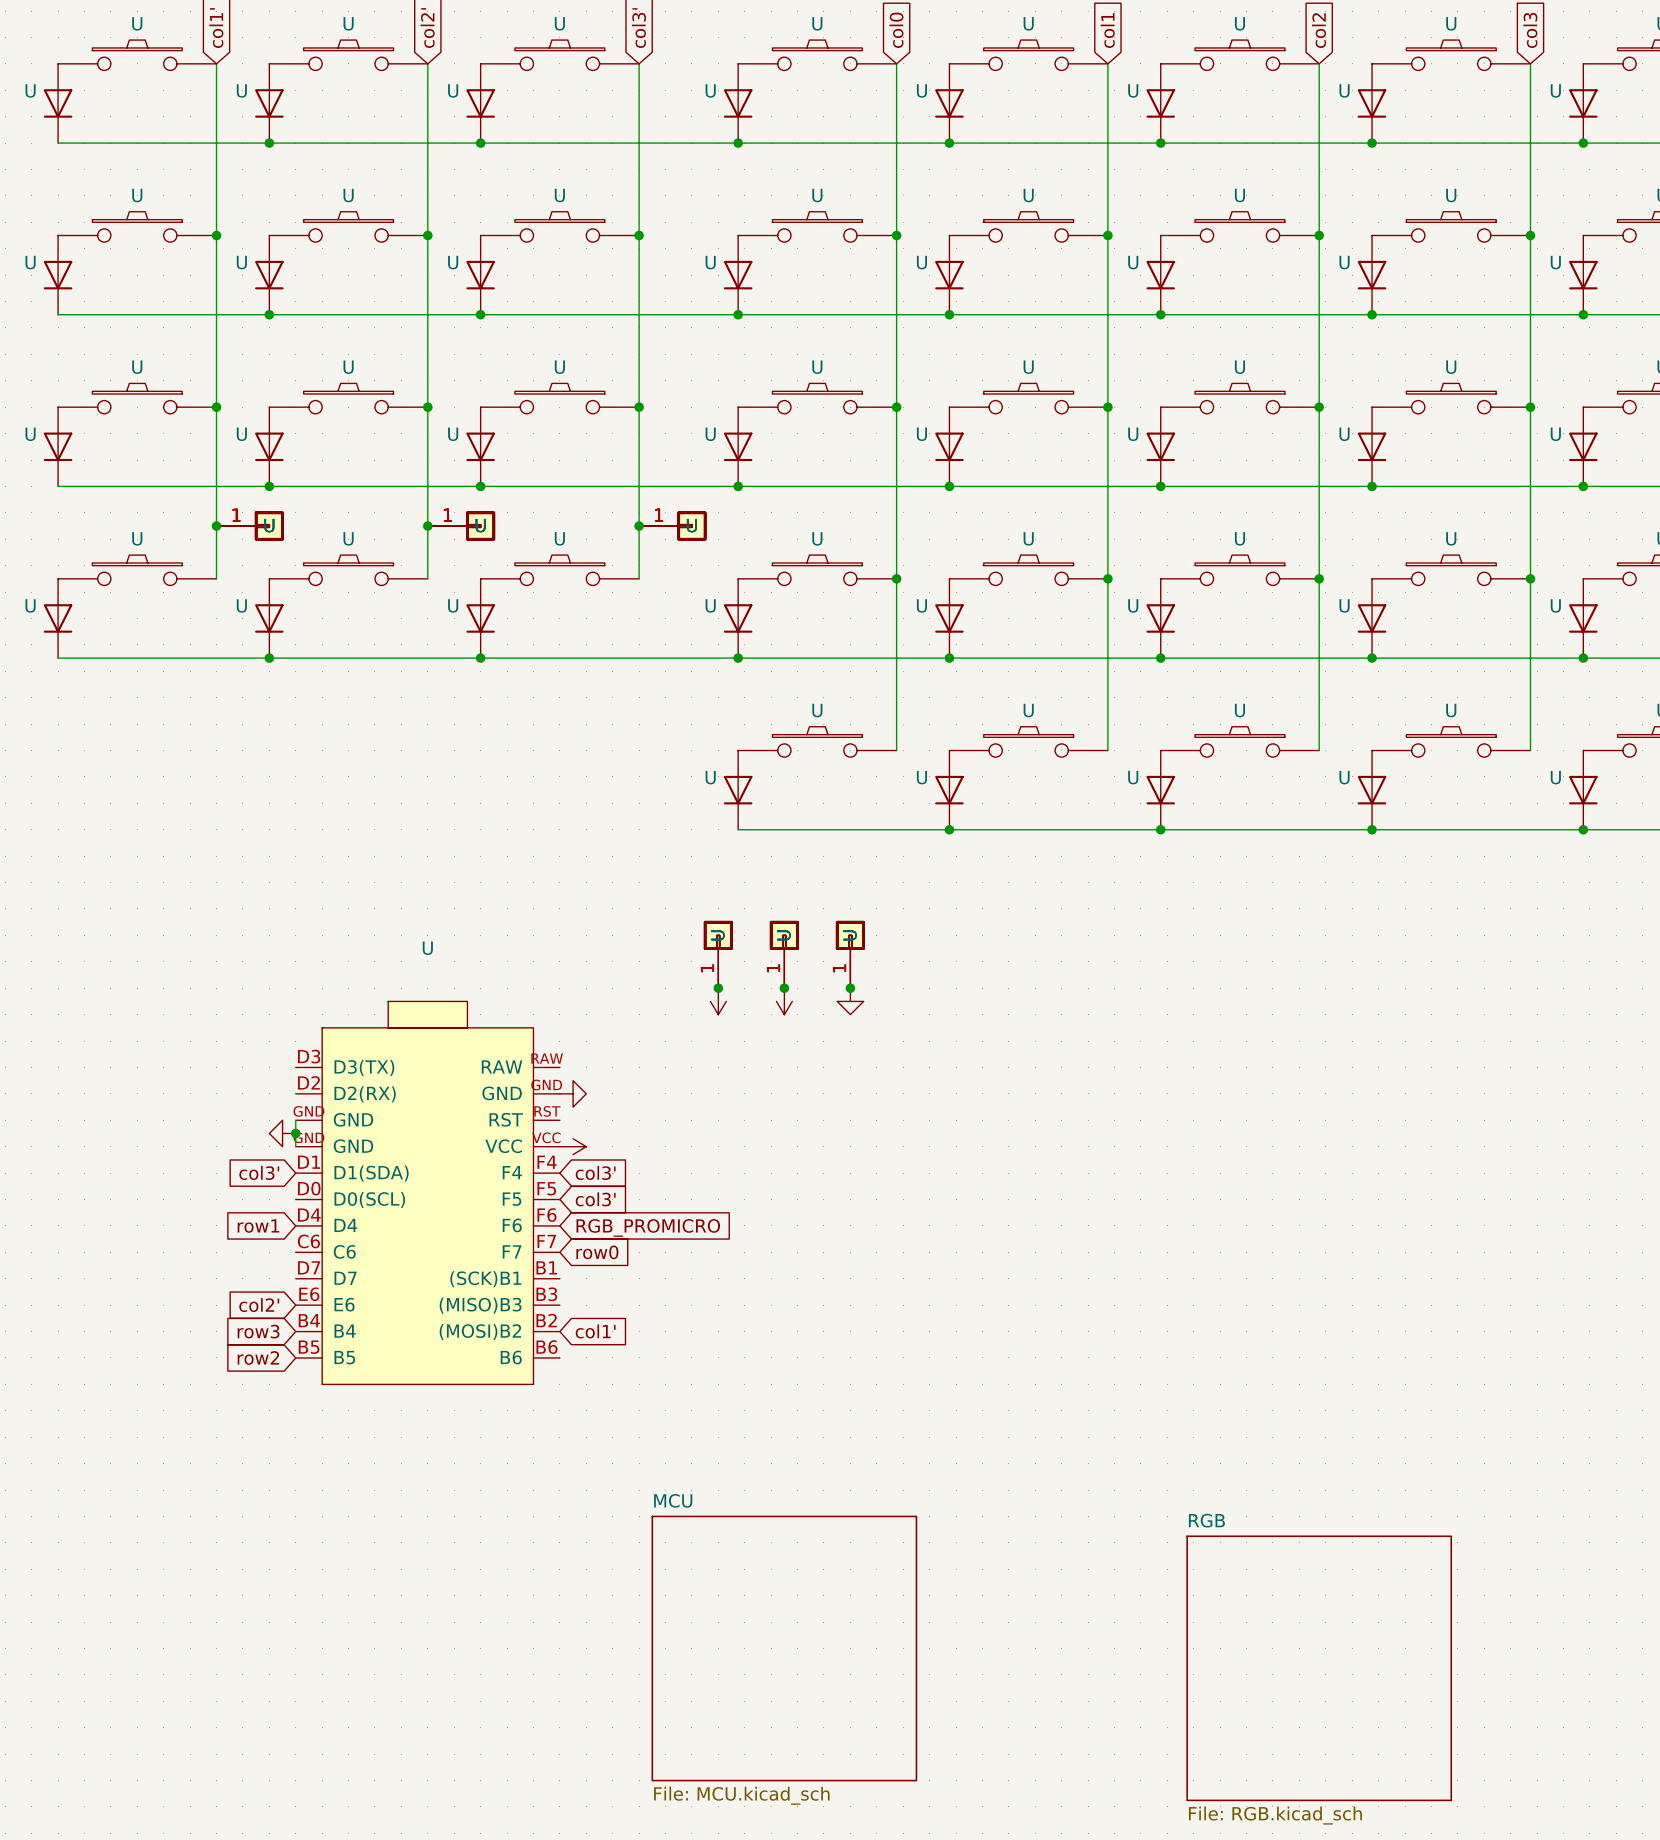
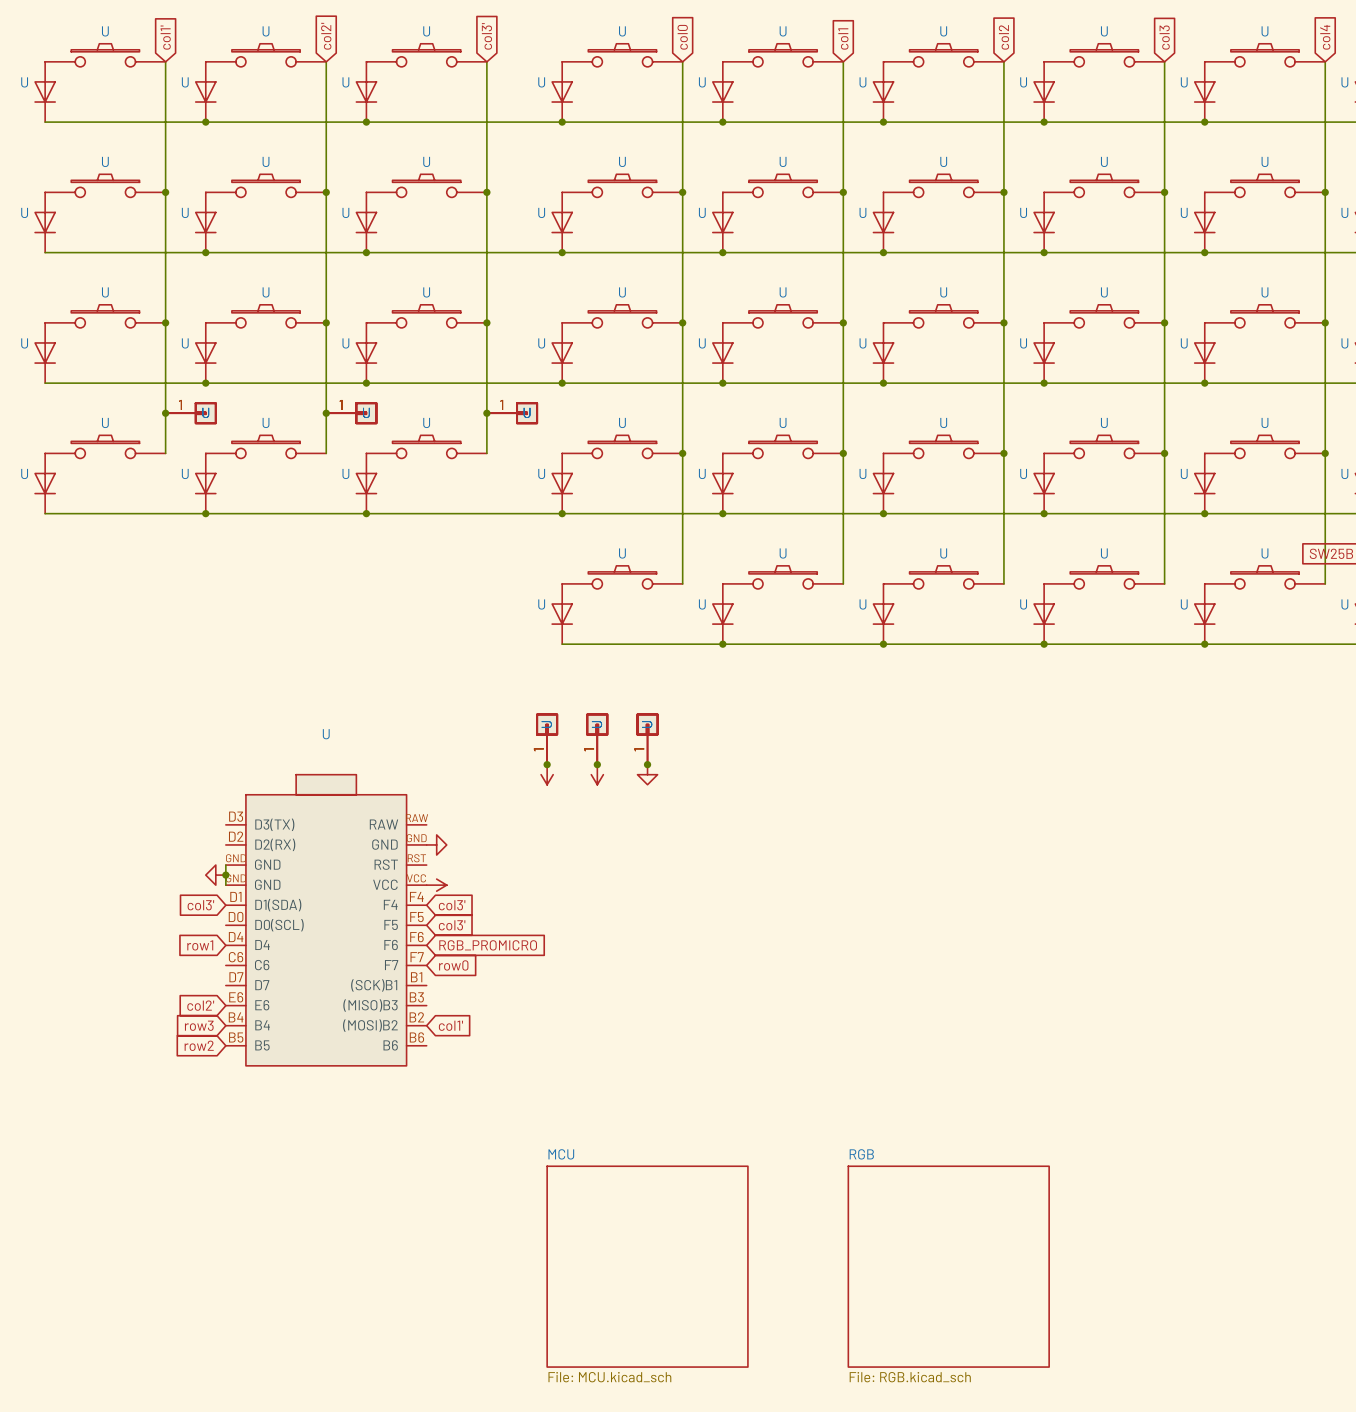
sheet MCU position: (784, 1648) -> (647, 1266)
sheet RGB position: (1319, 1668) -> (948, 1266)

